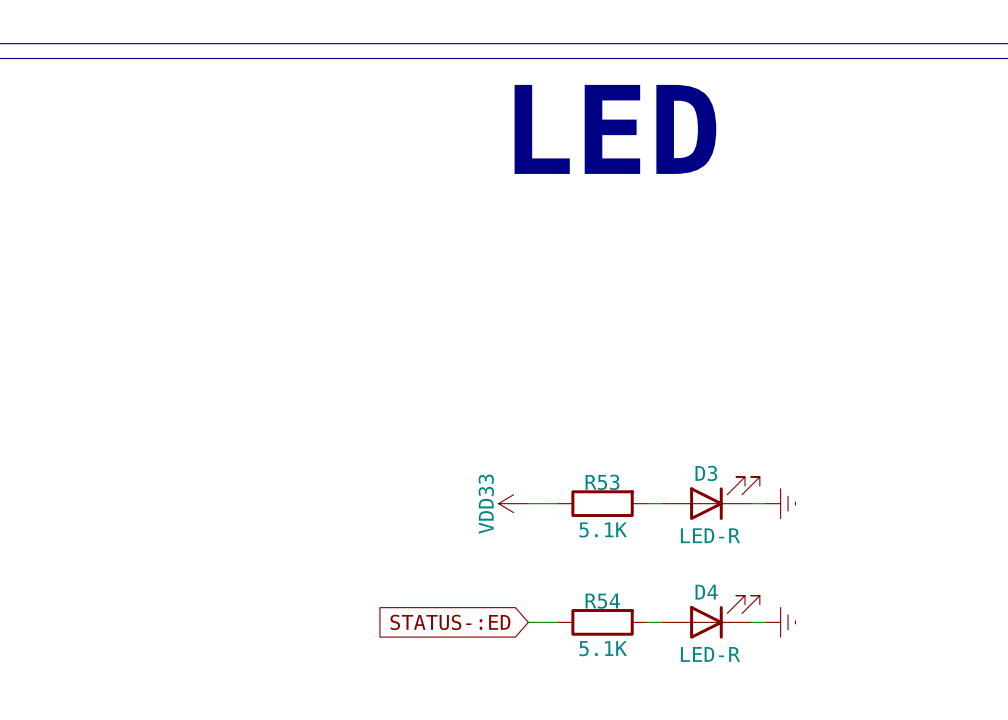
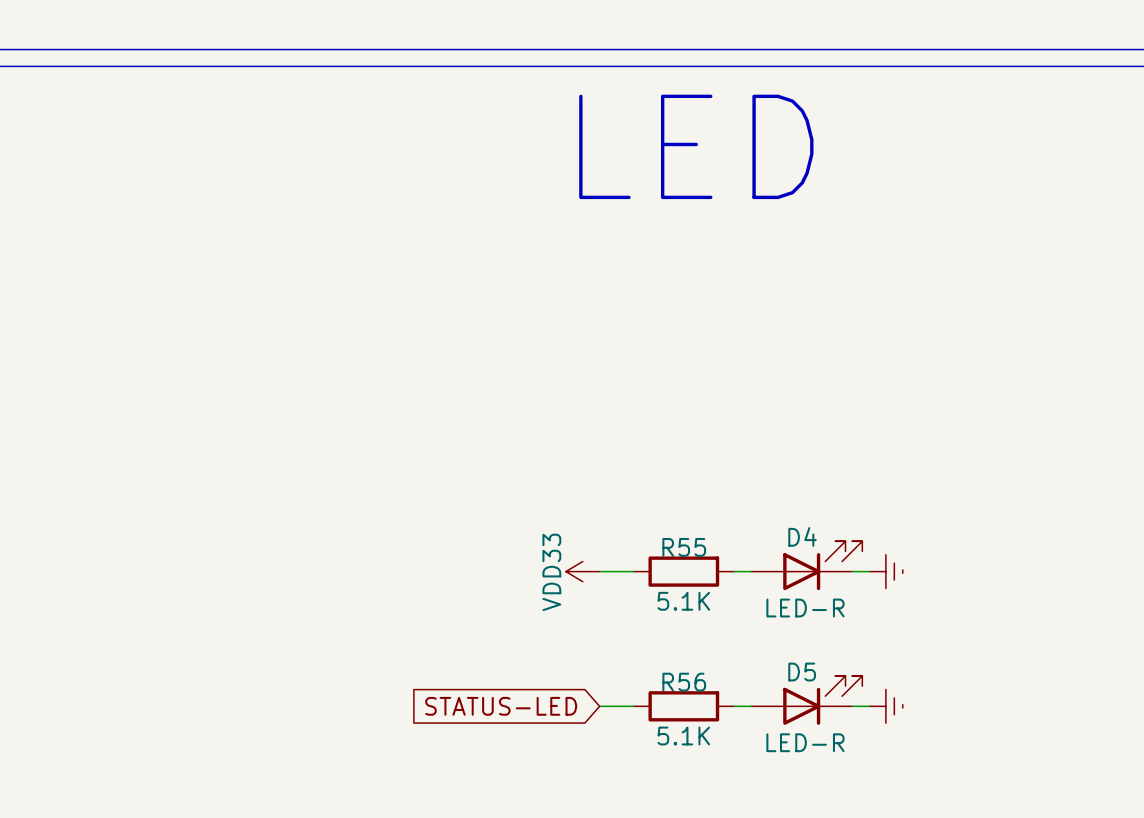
D3 name: D3 (706, 473) -> D4 (802, 536)
R53 name: R53 (602, 482) -> R55 (684, 547)
D4 name: D4 (706, 592) -> D5 (802, 672)
R54 name: R54 (602, 601) -> R56 (684, 682)
global label: STATUS-:ED (450, 622) -> STATUS-LED (501, 706)

